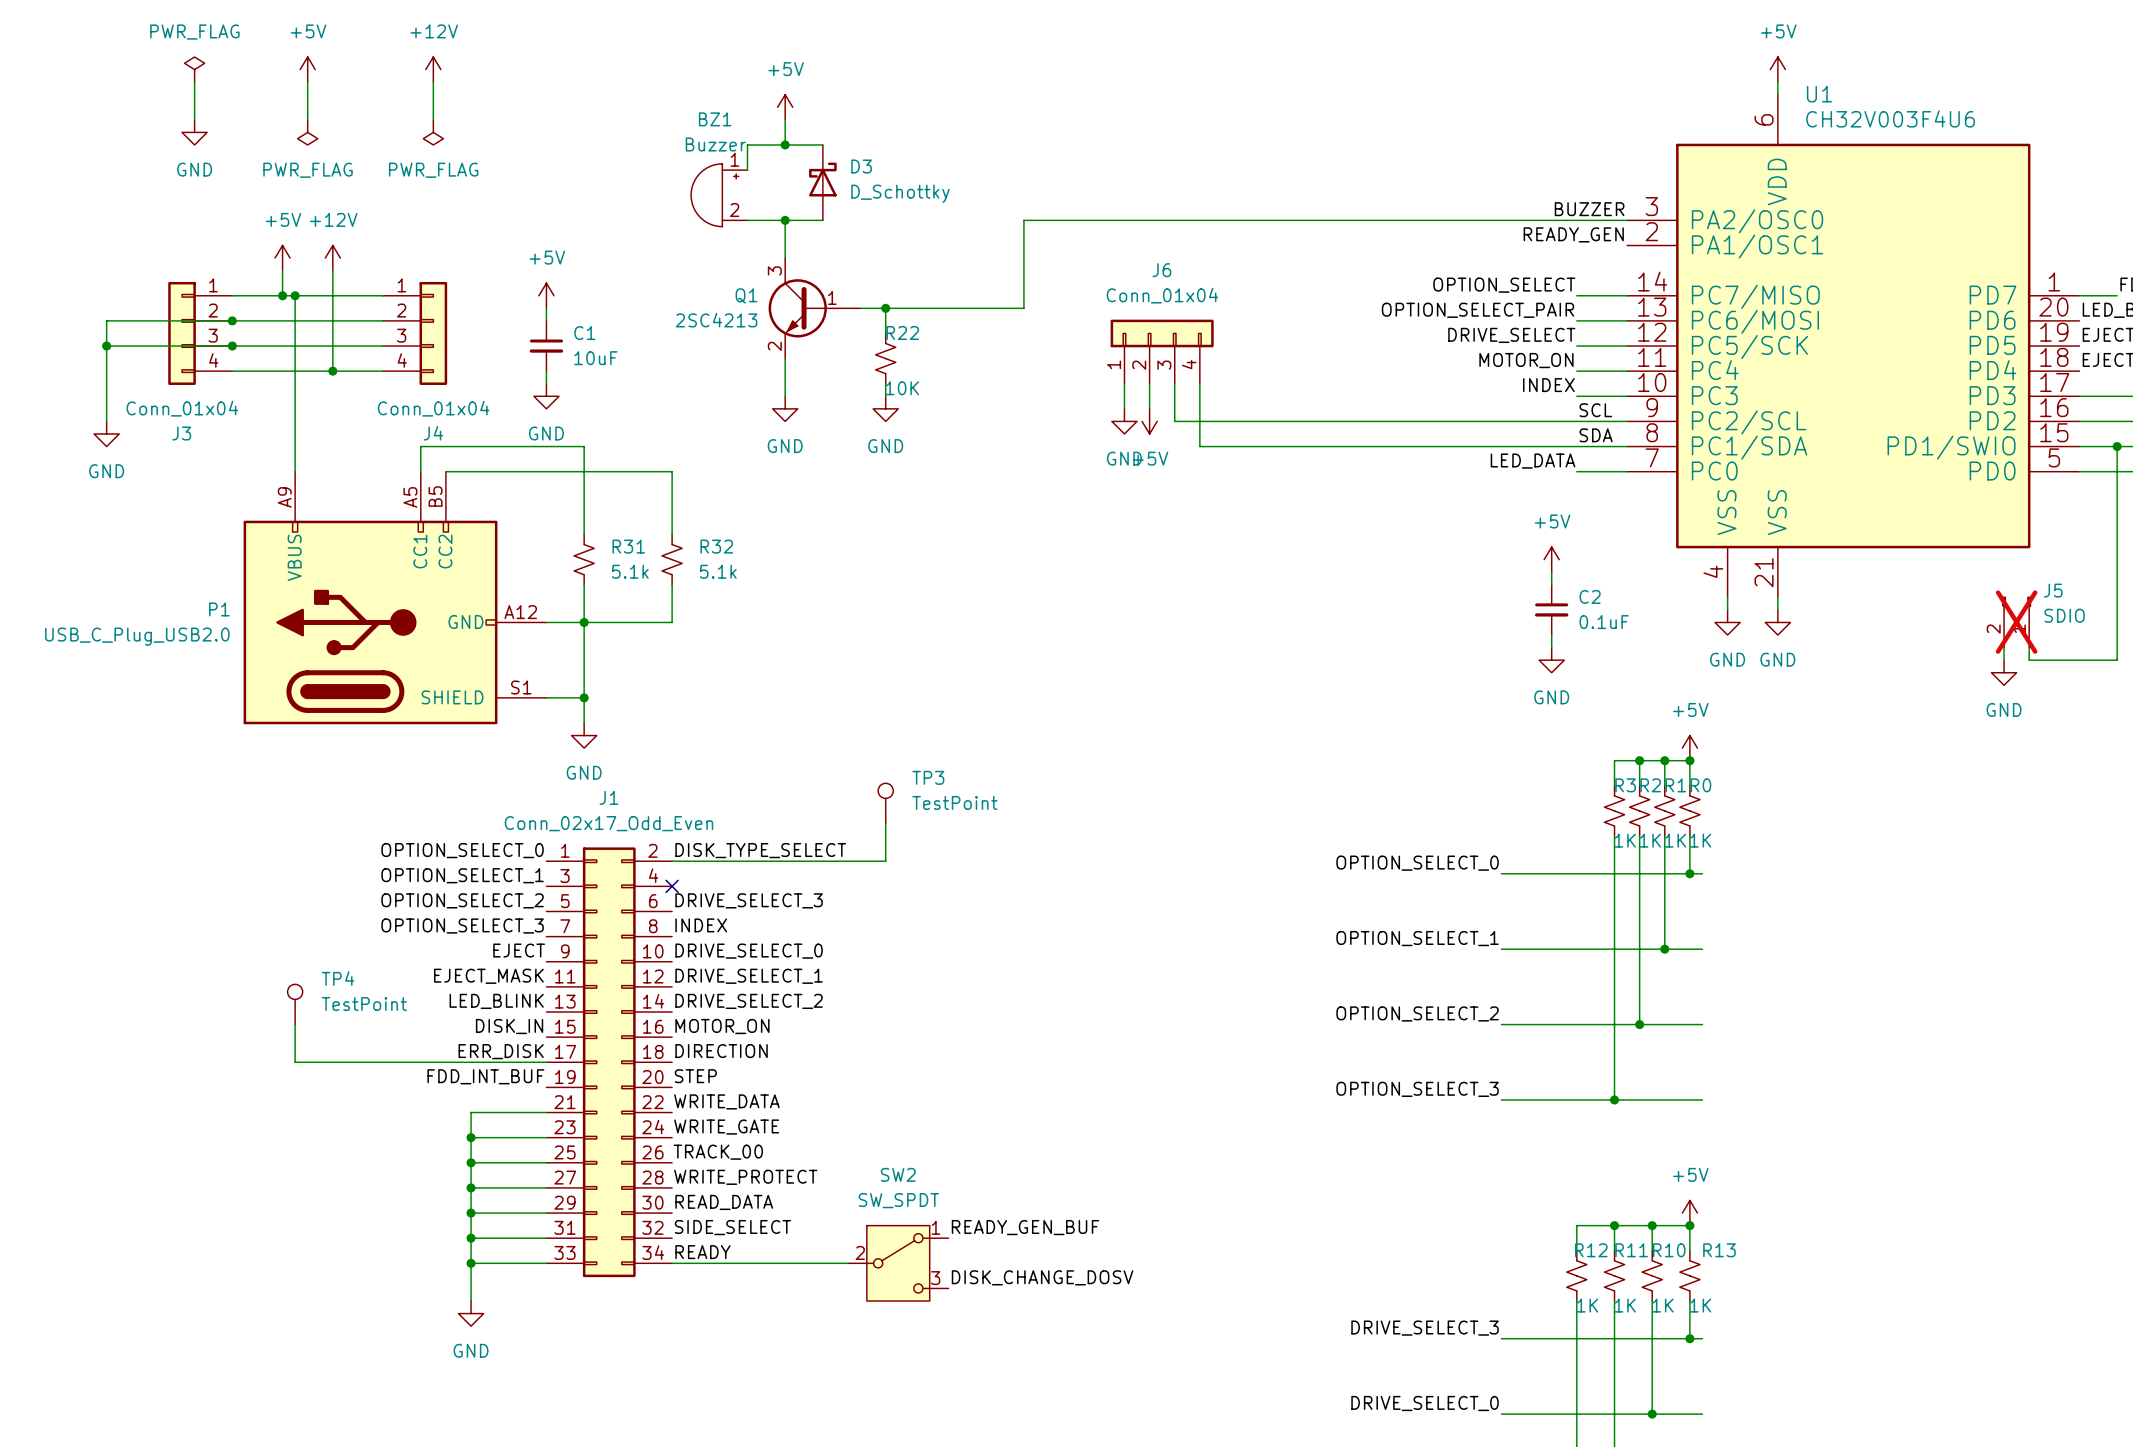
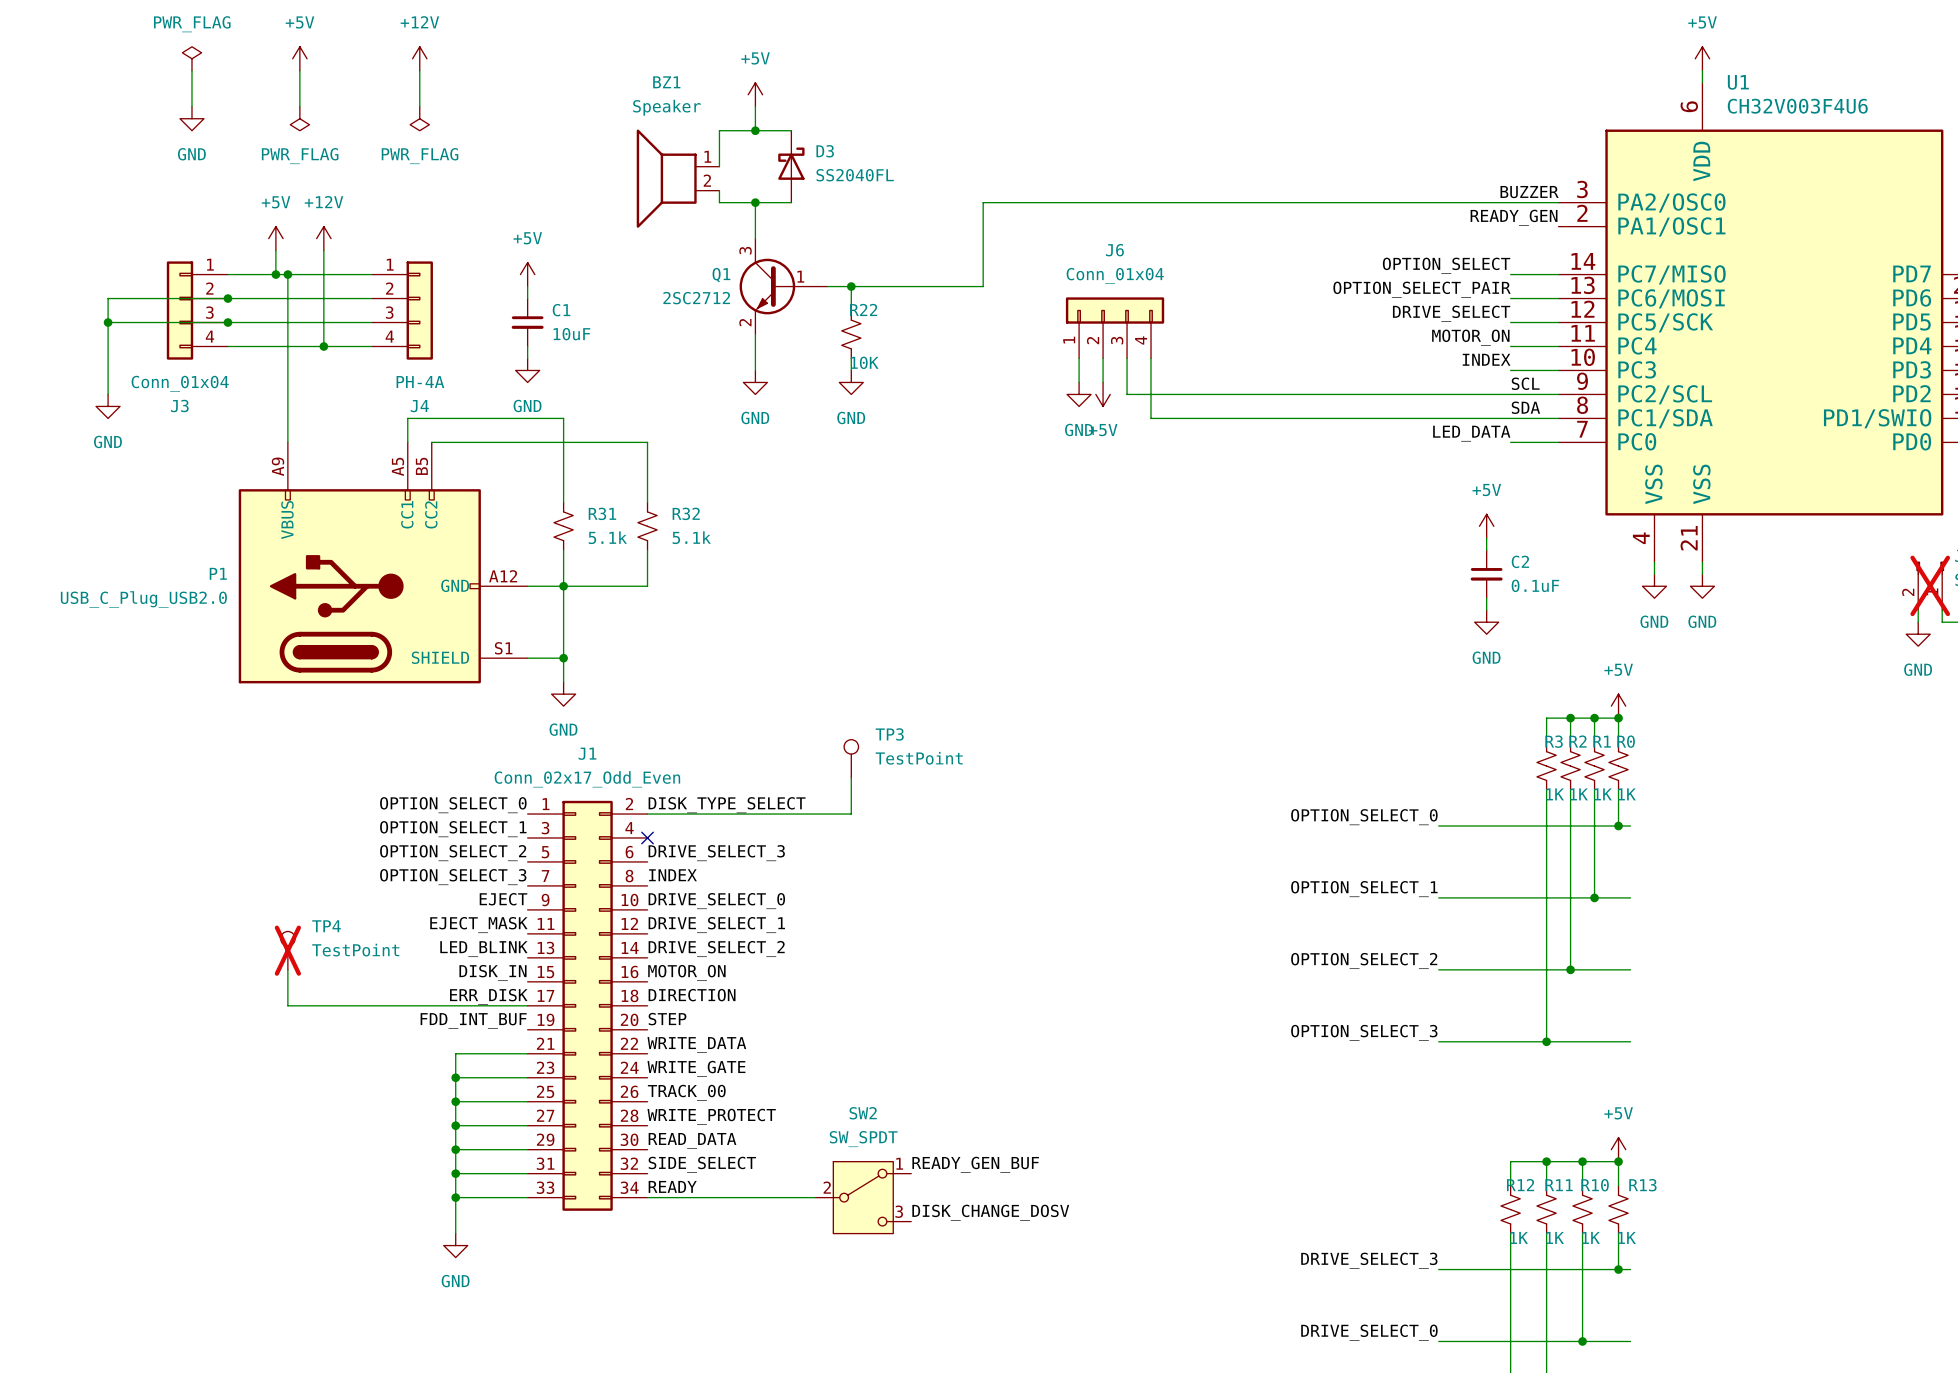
BZ1 name position: BZ1 (715, 119) -> BZ1 (666, 82)
BZ1 value: Buzzer (715, 144) -> Speaker (666, 107)
BZ1 symbol: [691, 163, 748, 227] -> [636, 129, 720, 228]
wire: none -> (719, 154) (719, 166)
D3 value: D_Schottky (900, 193) -> SS2040FL (855, 175)
wire: none -> (719, 190) (719, 202)
Q1 value: 2SC4213 (716, 320) -> 2SC2712 (696, 298)
J4 value: Conn_01x04 (433, 408) -> PH-4A (420, 382)
TP4 do-not-place cross: none -> (287, 950)

